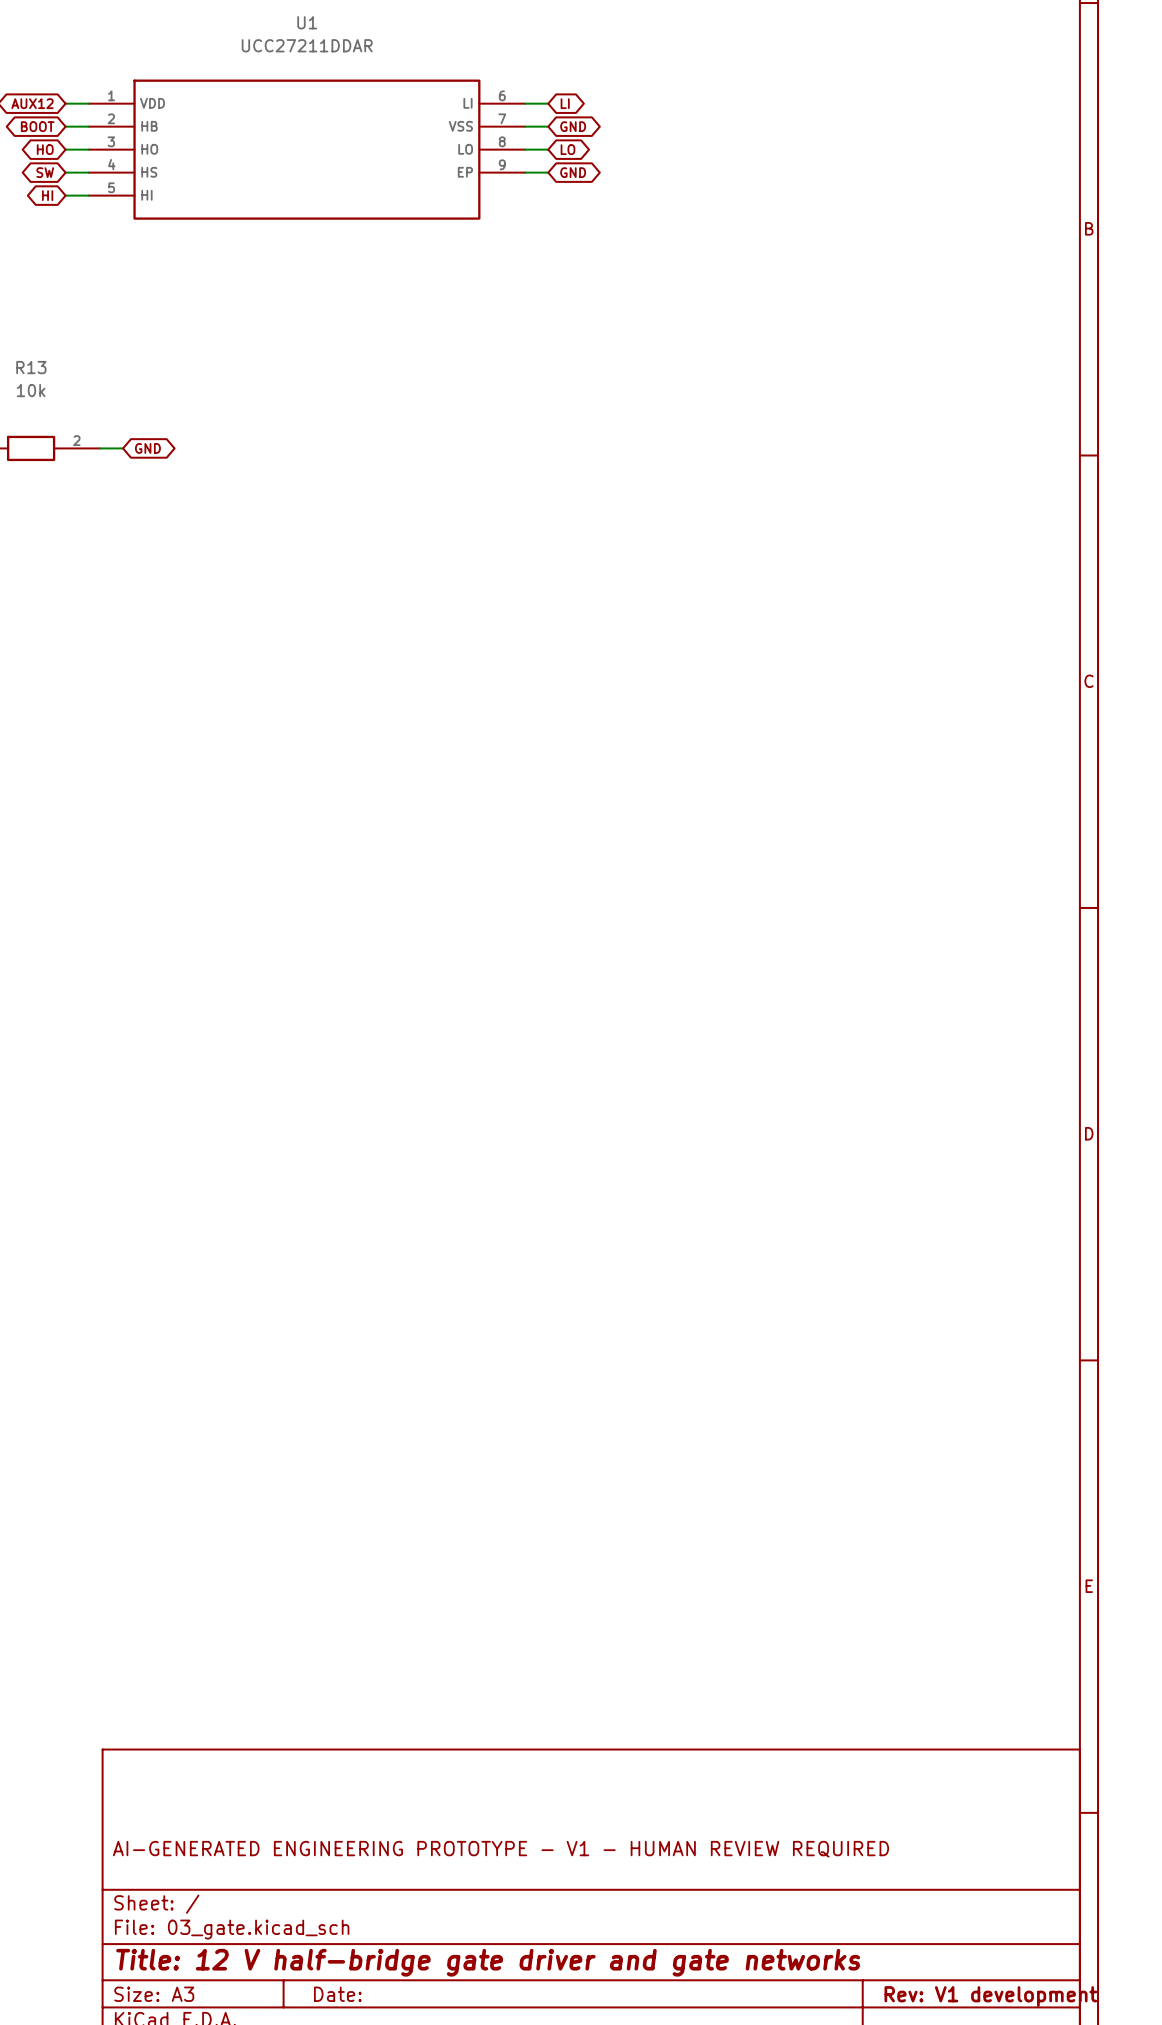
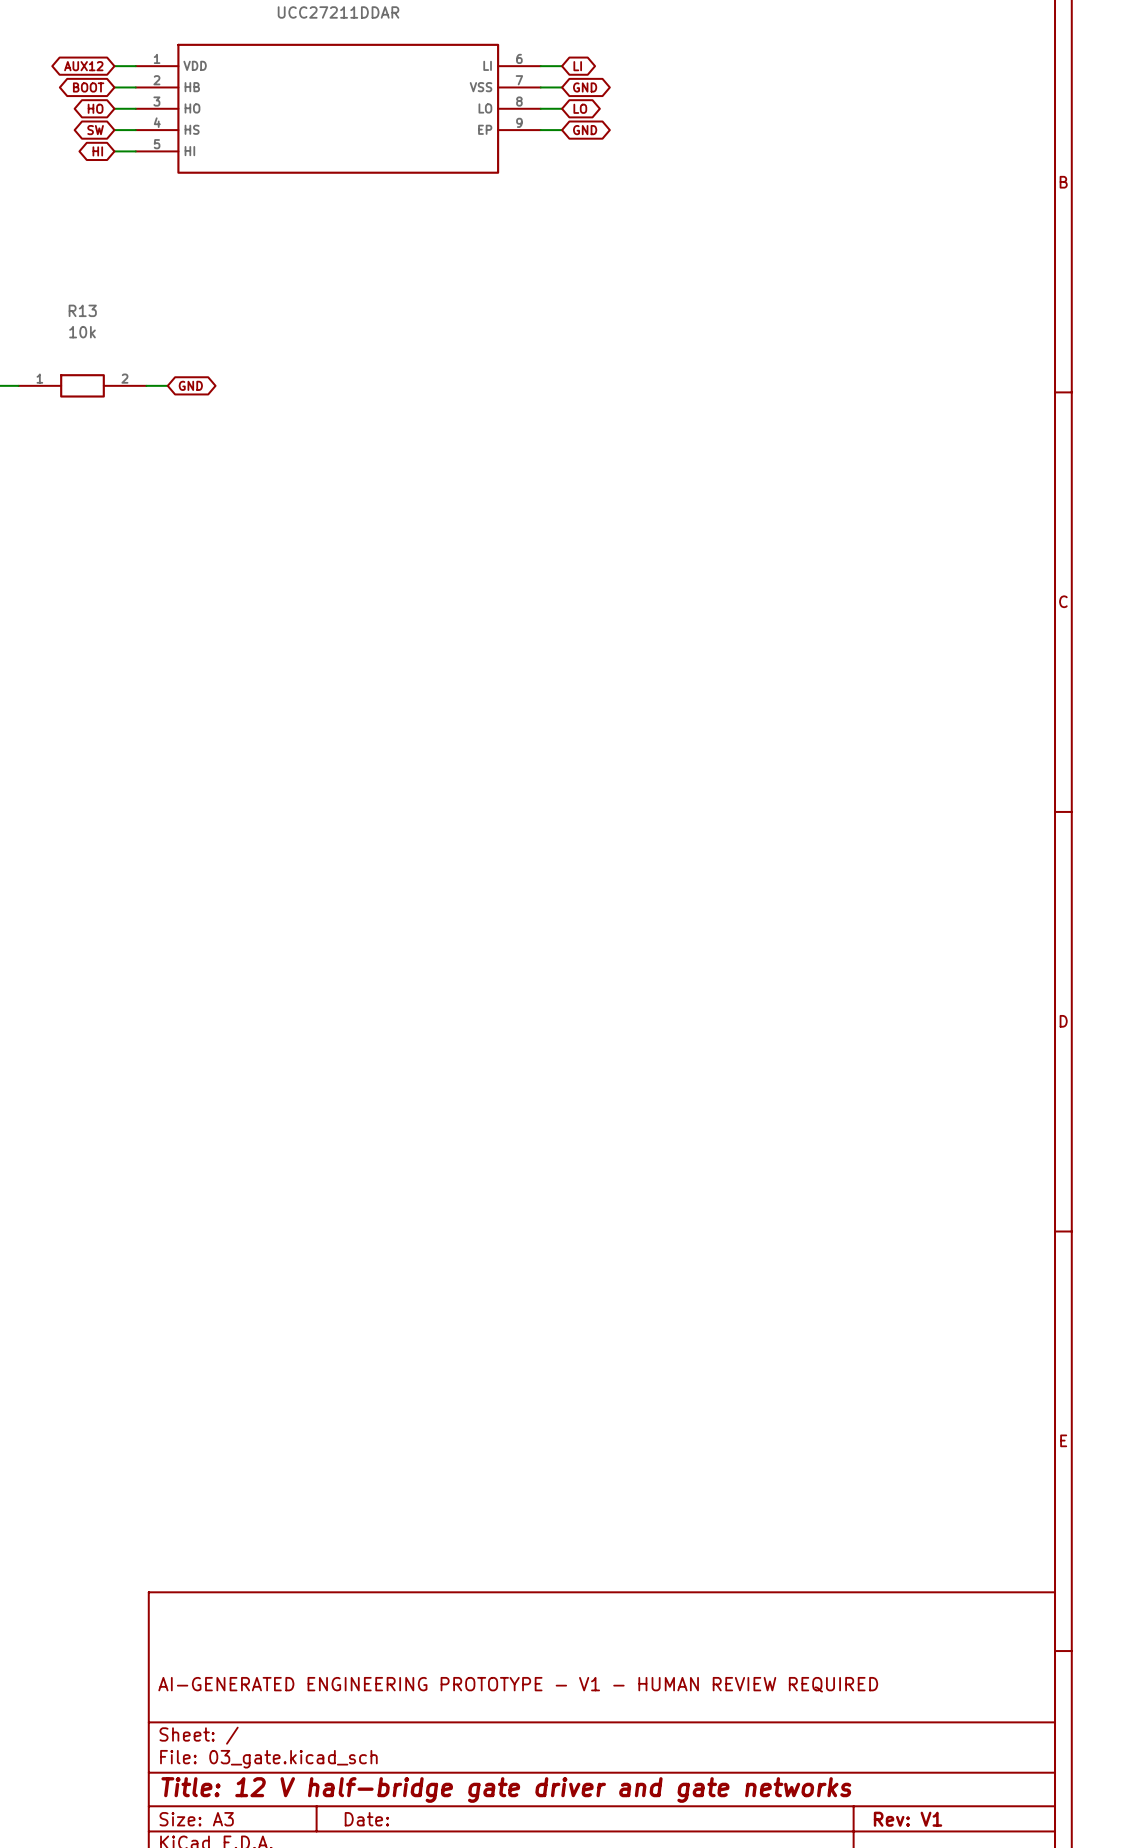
title block: Rev: V1 development (990, 1996) -> Rev: V1 (908, 1819)

